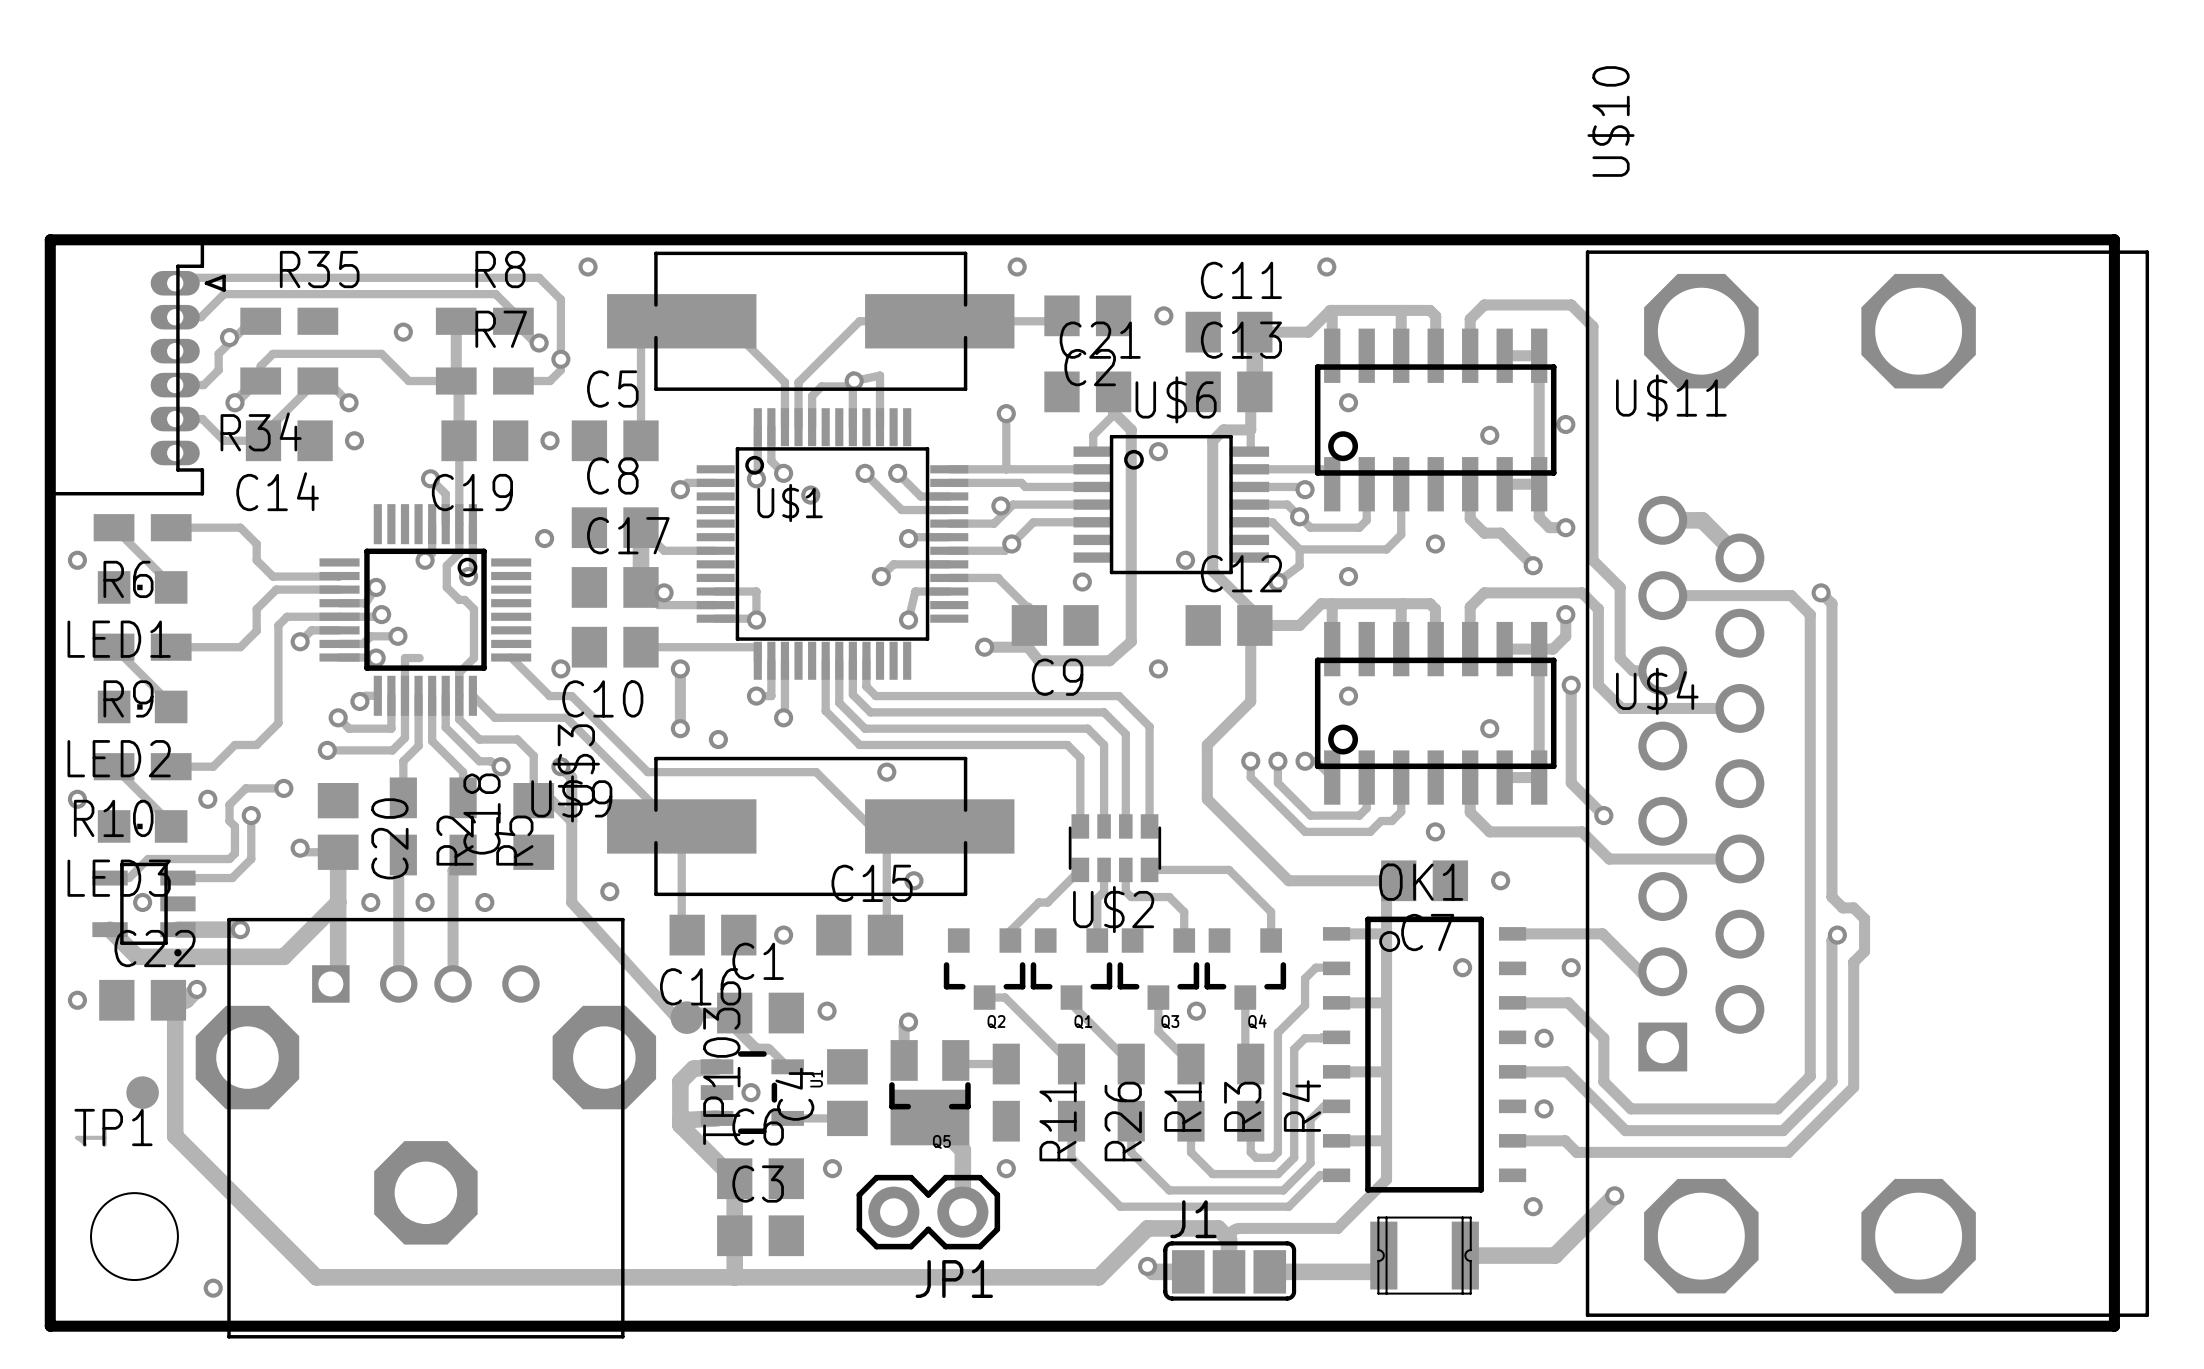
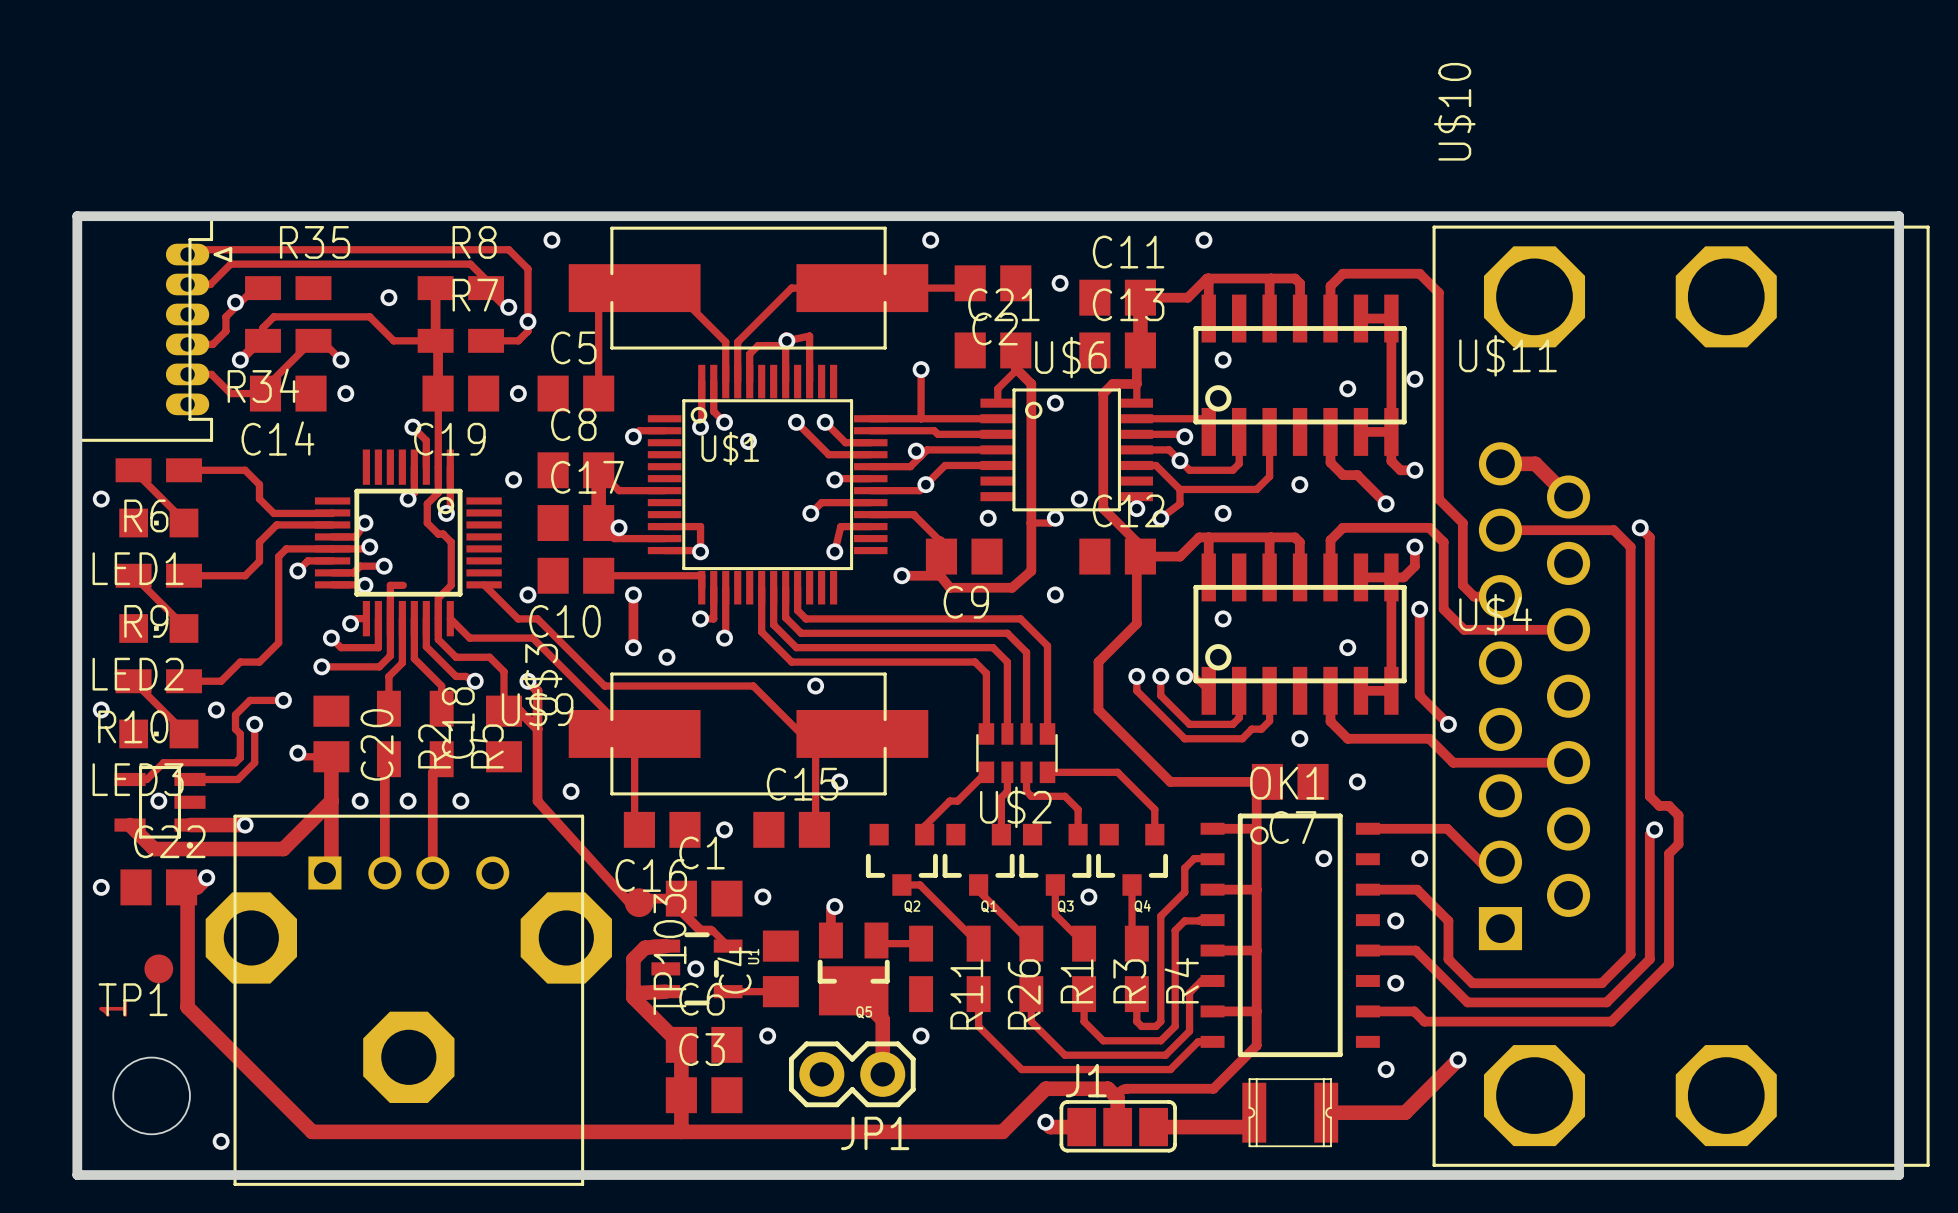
via: none -> (1136, 508)
track: none -> (1055, 518) (1050, 523) (1031, 523)
via: none -> (1055, 518)

